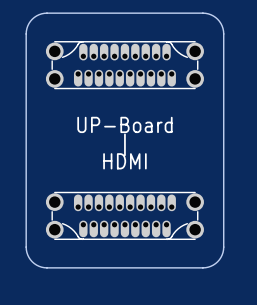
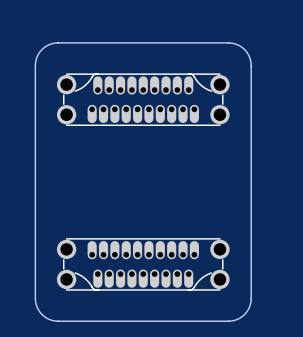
text: UP-Board (124, 124) -> none
text: | (124, 144) -> none
text: HDMI (124, 161) -> none

